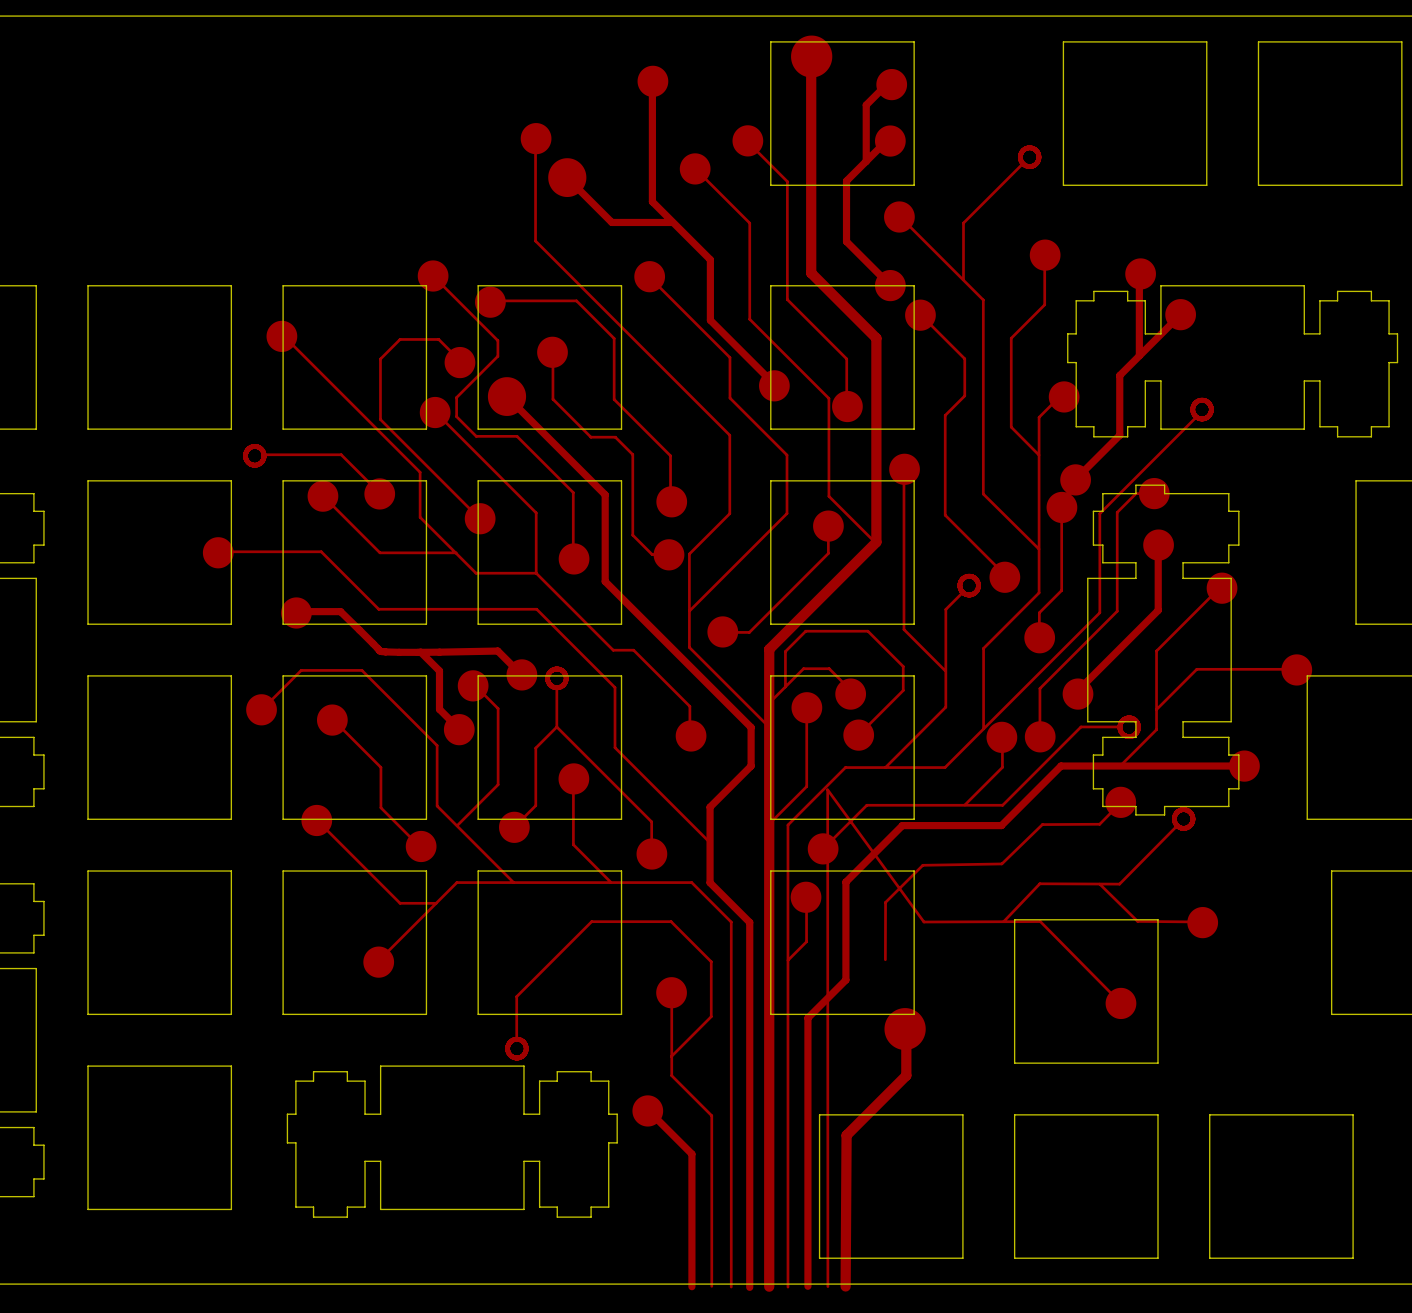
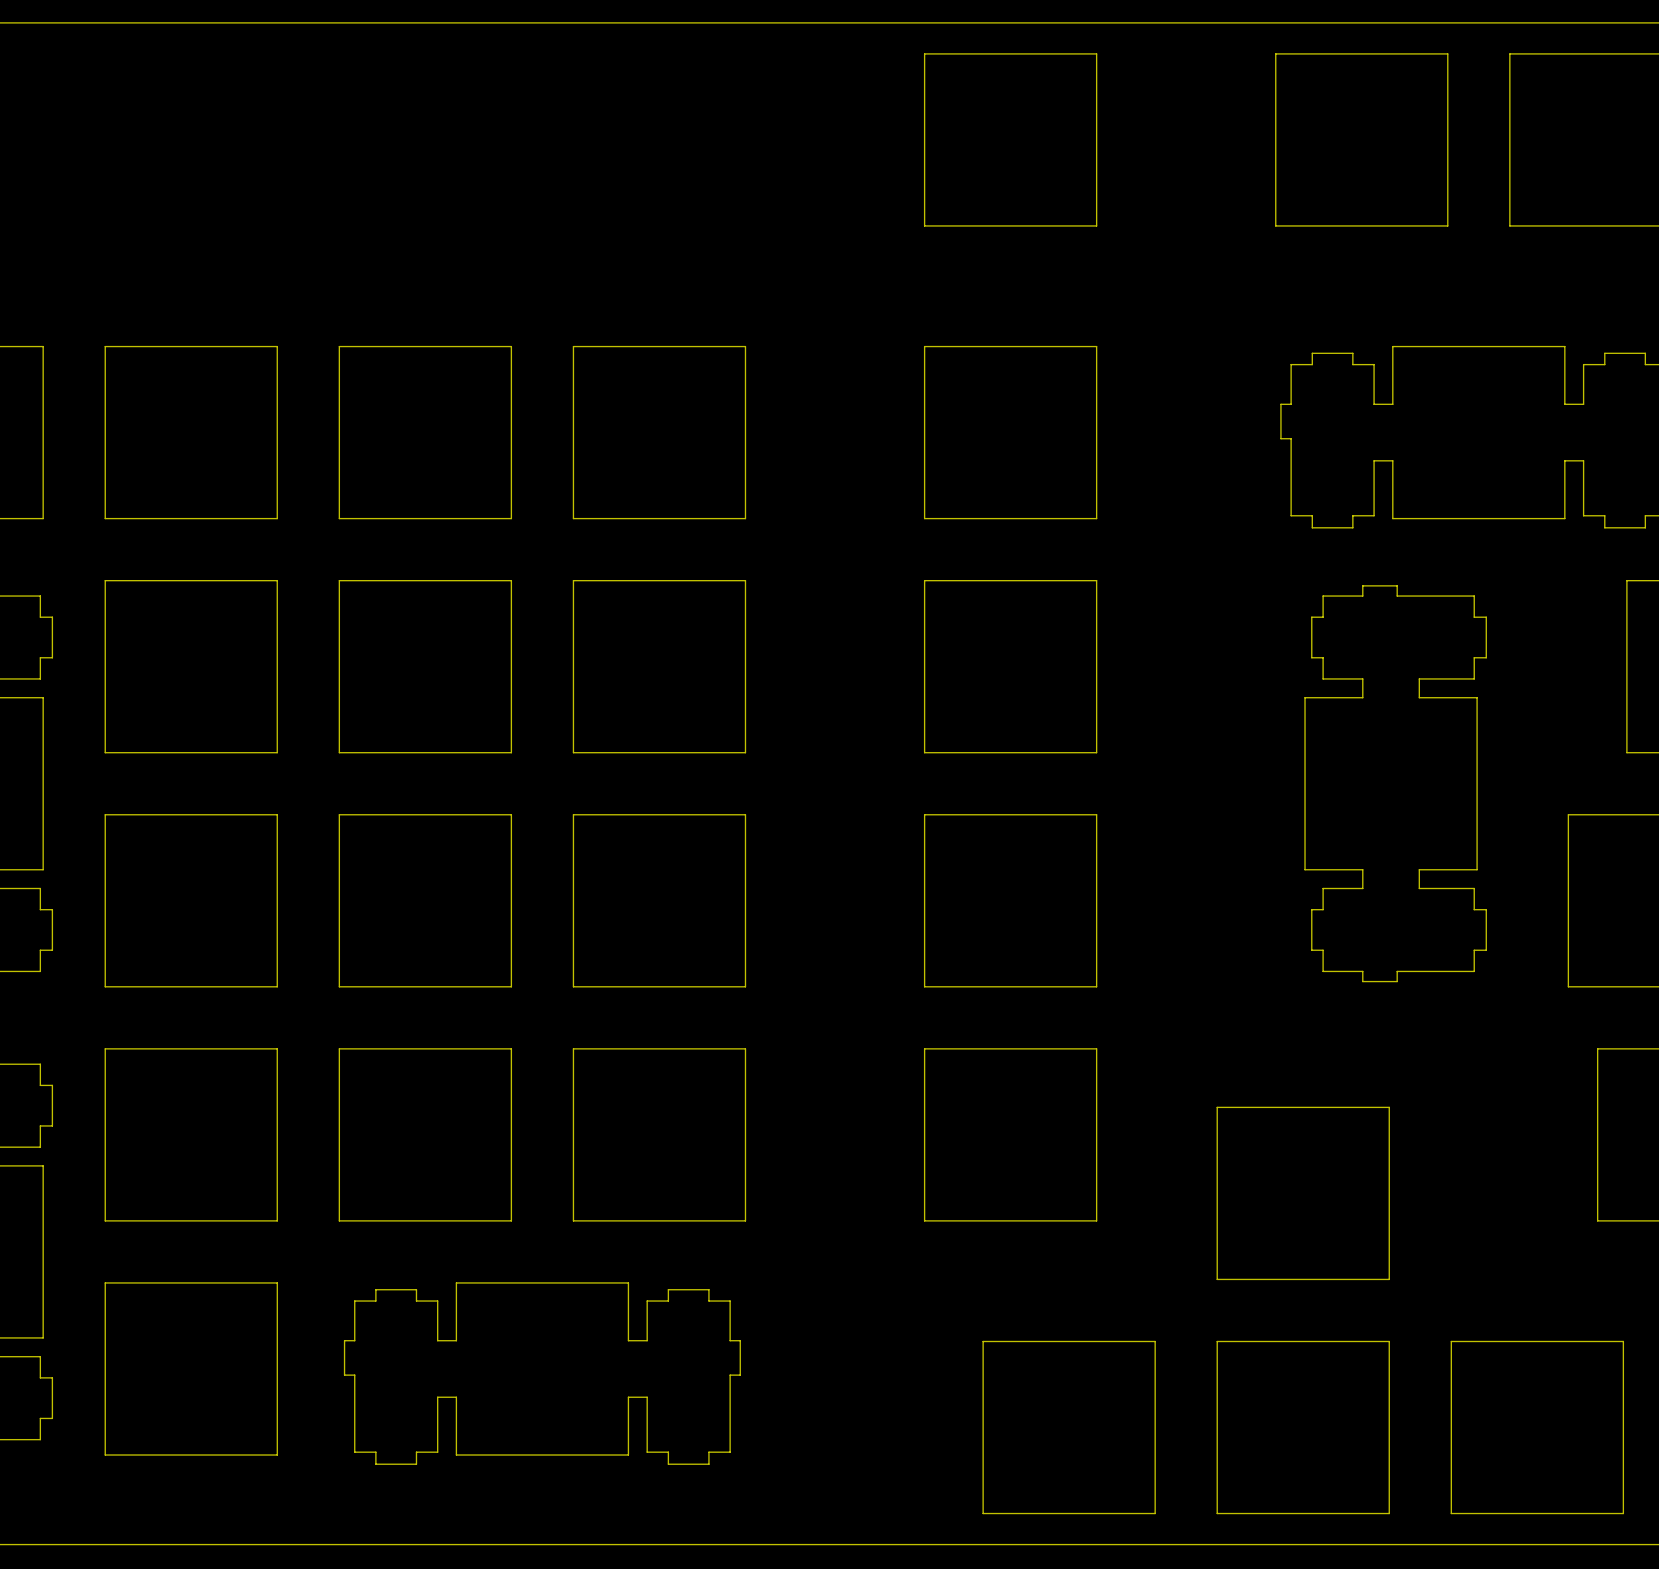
drawing: [791, 35, 833, 78] -> none
drawing: [637, 65, 669, 97] -> none
top track: (811, 69) (811, 273) (876, 338) (876, 542) (769, 649) (769, 1286) -> none
drawing: [876, 69, 908, 101] -> none
top track: (885, 85) (866, 105) (866, 161) -> none
top track: (652, 87) (652, 201) (710, 259) (710, 320) (771, 381) -> none
drawing: [520, 123, 587, 198] -> none
drawing: [732, 125, 764, 157] -> none
drawing: [874, 125, 906, 157] -> none
top track: (885, 141) (846, 181) (846, 241) (886, 281) -> none
top track: (752, 146) (787, 181) (787, 299) (846, 358) (846, 397) -> none
top track: (535, 147) (535, 241) (729, 435) (729, 513) (689, 554) (689, 647) (765, 723) -> none
top track: (1029, 147) (1023, 150) (1020, 157) (1023, 163) (1029, 166) (1036, 163) (1038, 157) (1036, 150) (1029, 147) -> none
drawing: [679, 153, 711, 185] -> none
top track: (1021, 164) (963, 223) (963, 279) -> none
top track: (699, 173) (749, 223) (749, 319) (828, 398) (828, 496) (872, 540) -> none
top track: (574, 185) (611, 222) (671, 222) -> none
drawing: [884, 201, 915, 233] -> none
top track: (903, 219) (983, 300) (983, 494) (1038, 549) -> none
drawing: [1029, 239, 1061, 271] -> none
drawing: [1125, 258, 1156, 290] -> none
drawing: [417, 260, 449, 292] -> none
top track: (1044, 260) (1044, 304) (1011, 338) (1011, 427) (1038, 455) -> none
drawing: [634, 261, 666, 293] -> none
drawing: [874, 269, 936, 331] -> none
top track: (1139, 280) (1139, 355) -> none
top track: (438, 281) (497, 340) (497, 356) (456, 397) (456, 416) (476, 436) (517, 436) (573, 492) (573, 550) -> none
top track: (655, 283) (729, 357) (729, 398) (787, 455) (787, 513) (689, 610) -> none
drawing: [475, 286, 506, 318] -> none
drawing: [1165, 299, 1196, 331] -> none
top track: (493, 300) (576, 300) (614, 338) (614, 399) (670, 455) (670, 493) -> none
top track: (1176, 319) (1119, 375) (1119, 435) (1080, 474) -> none
drawing: [266, 320, 298, 352] -> none
top track: (927, 321) (964, 358) (964, 395) (945, 415) (945, 515) (999, 569) -> none
drawing: [537, 336, 568, 368] -> none
top track: (288, 340) (420, 472) (420, 517) (476, 573) (536, 573) -> none
drawing: [444, 346, 476, 379] -> none
top track: (454, 355) (438, 339) (400, 339) (380, 359) (380, 419) (475, 515) -> none
top track: (552, 357) (552, 399) (590, 437) (615, 437) (632, 454) (632, 535) (652, 554) (659, 554) -> none
drawing: [759, 370, 790, 402] -> none
drawing: [487, 377, 527, 416] -> none
drawing: [1048, 381, 1080, 413] -> none
drawing: [832, 390, 863, 423] -> none
drawing: [419, 396, 451, 429] -> none
top track: (1057, 399) (1039, 417) (1039, 592) (983, 648) (983, 728) -> none
top track: (1202, 400) (1208, 403) (1211, 410) (1208, 416) (1201, 418) (1195, 415) (1192, 409) (1195, 402) (1202, 400) -> none
top track: (513, 403) (605, 494) (605, 581) (751, 727) (751, 766) (710, 807) (710, 882) (749, 922) (749, 1287) -> none
top track: (440, 417) (536, 512) (536, 573) -> none
top track: (1195, 418) (1099, 513) (1099, 612) (945, 767) (845, 767) (787, 825) (787, 1287) -> none
top track: (255, 446) (248, 448) (245, 454) (247, 461) (253, 465) (260, 463) (264, 456) (261, 449) (255, 446) -> none
drawing: [889, 453, 920, 485] -> none
top track: (263, 454) (341, 454) (374, 487) -> none
drawing: [1046, 464, 1091, 524] -> none
drawing: [364, 478, 396, 510] -> none
top track: (903, 478) (903, 629) (944, 670) -> none
drawing: [1138, 478, 1170, 510] -> none
drawing: [307, 480, 339, 512] -> none
drawing: [656, 486, 688, 518] -> none
top track: (1148, 493) (1136, 493) (1117, 512) (1117, 611) (1039, 688) (1039, 729) -> none
top track: (328, 501) (379, 552) (456, 552) -> none
drawing: [464, 503, 496, 535] -> none
drawing: [813, 510, 844, 542] -> none
top track: (1061, 513) (1061, 590) (1039, 612) (1039, 631) -> none
drawing: [1143, 529, 1174, 561] -> none
top track: (828, 535) (828, 553) (749, 632) (731, 632) -> none
drawing: [202, 537, 234, 569] -> none
drawing: [653, 539, 685, 571] -> none
drawing: [558, 543, 590, 575] -> none
top track: (1158, 550) (1158, 610) (1080, 688) -> none
top track: (223, 551) (321, 551) (378, 609) (536, 609) (615, 687) (615, 747) (707, 840) -> none
drawing: [989, 561, 1021, 593] -> none
drawing: [1206, 572, 1238, 604] -> none
top track: (536, 573) (613, 650) (633, 650) (689, 706) (689, 727) -> none
top track: (969, 576) (962, 578) (959, 585) (962, 591) (968, 595) (975, 592) (978, 586) (976, 579) (969, 576) -> none
top track: (962, 592) (945, 609) (945, 707) (885, 767) -> none
top track: (1215, 592) (1156, 651) (1156, 729) (1121, 764) -> none
drawing: [281, 597, 312, 629] -> none
top track: (303, 611) (340, 611) (381, 651) (497, 651) (517, 671) -> none
drawing: [707, 616, 739, 648] -> none
drawing: [1024, 622, 1056, 654] -> none
top track: (420, 652) (439, 670) (439, 709) (453, 723) -> none
drawing: [1281, 654, 1313, 686] -> none
drawing: [506, 659, 538, 691] -> none
top track: (557, 669) (564, 672) (566, 679) (562, 685) (555, 687) (549, 684) (547, 677) (551, 671) (557, 669) -> none
top track: (1290, 669) (1196, 669) (1156, 709) -> none
drawing: [457, 670, 489, 702] -> none
drawing: [835, 678, 875, 751] -> none
drawing: [1062, 678, 1094, 710] -> none
top track: (785, 686) (785, 651) (805, 631) (867, 631) (903, 666) (903, 690) (862, 731) -> none
top track: (477, 687) (498, 708) (498, 784) (457, 825) -> none
top track: (847, 687) (829, 668) (803, 668) (769, 703) -> none
top track: (556, 689) (556, 727) -> none
drawing: [791, 692, 823, 724] -> none
drawing: [246, 694, 277, 726] -> none
drawing: [317, 704, 348, 736] -> none
top track: (265, 706) (301, 670) (361, 670) (437, 745) (437, 806) (513, 882) -> none
drawing: [443, 714, 475, 746] -> none
top track: (806, 714) (806, 786) (771, 822) -> none
top track: (1129, 717) (1136, 720) (1138, 727) (1135, 734) (1128, 736) (1122, 733) (1119, 726) (1122, 720) (1129, 717) -> none
drawing: [675, 720, 707, 752] -> none
drawing: [986, 721, 1056, 753] -> none
top track: (337, 723) (380, 767) (380, 807) (415, 842) -> none
top track: (1117, 726) (1080, 726) (1002, 805) (866, 805) (829, 842) -> none
top track: (556, 727) (535, 748) (535, 805) (520, 821) -> none
top track: (556, 727) (651, 821) (651, 845) -> none
top track: (1002, 745) (1002, 767) (964, 804) -> none
drawing: [1229, 750, 1260, 782] -> none
drawing: [558, 763, 590, 795] -> none
top track: (1235, 766) (1061, 766) (1001, 825) (902, 825) (845, 882) (845, 980) (807, 1018) (807, 1286) -> none
drawing: [1105, 786, 1137, 818] -> none
top track: (573, 787) (573, 844) (610, 882) -> none
drawing: [301, 804, 333, 837] -> none
top track: (1116, 807) (1099, 824) (1042, 824) (1001, 863) (922, 865) (885, 902) (885, 959) -> none
top track: (1184, 809) (1190, 812) (1192, 819) (1189, 825) (1183, 828) (1176, 825) (1174, 818) (1177, 812) (1184, 809) -> none
drawing: [499, 811, 530, 843] -> none
top track: (322, 825) (400, 903) (436, 903) -> none
top track: (1176, 826) (1119, 884) (1039, 883) (1003, 921) -> none
drawing: [405, 830, 437, 863] -> none
drawing: [807, 833, 839, 865] -> none
drawing: [636, 838, 668, 870] -> none
drawing: [790, 881, 822, 913] -> none
top track: (1099, 884) (1137, 921) (1194, 921) -> none
top track: (806, 904) (806, 941) (787, 960) -> none
drawing: [1187, 907, 1219, 939] -> none
drawing: [363, 946, 395, 978] -> none
top track: (381, 957) (456, 882) (691, 882) (731, 922) (731, 1287) -> none
drawing: [656, 977, 687, 1009] -> none
drawing: [1105, 987, 1137, 1020] -> none
top track: (1115, 998) (1040, 921) (923, 922) (827, 789) (827, 1286) -> none
top track: (671, 1001) (671, 1075) (711, 1115) (711, 1286) -> none
drawing: [884, 1008, 926, 1051] -> none
top track: (517, 1039) (524, 1042) (526, 1049) (522, 1055) (515, 1057) (509, 1054) (507, 1047) (510, 1041) (517, 1039) -> none
top track: (516, 1040) (516, 996) (591, 921) (671, 921) (711, 961) (711, 1016) (671, 1056) -> none
top track: (906, 1040) (906, 1075) (846, 1135) (845, 1286) -> none
drawing: [632, 1095, 664, 1127] -> none
top track: (653, 1116) (691, 1154) (691, 1286) -> none

